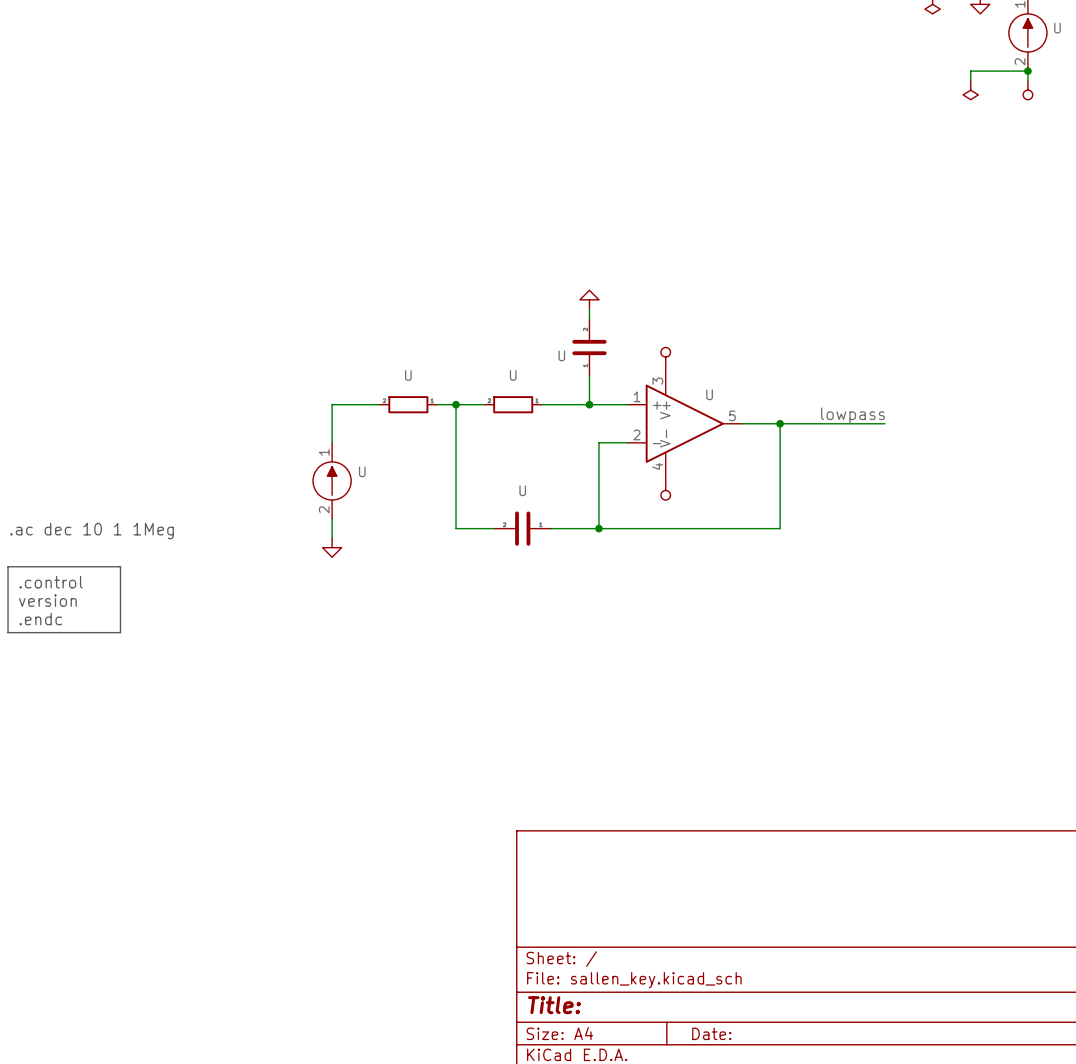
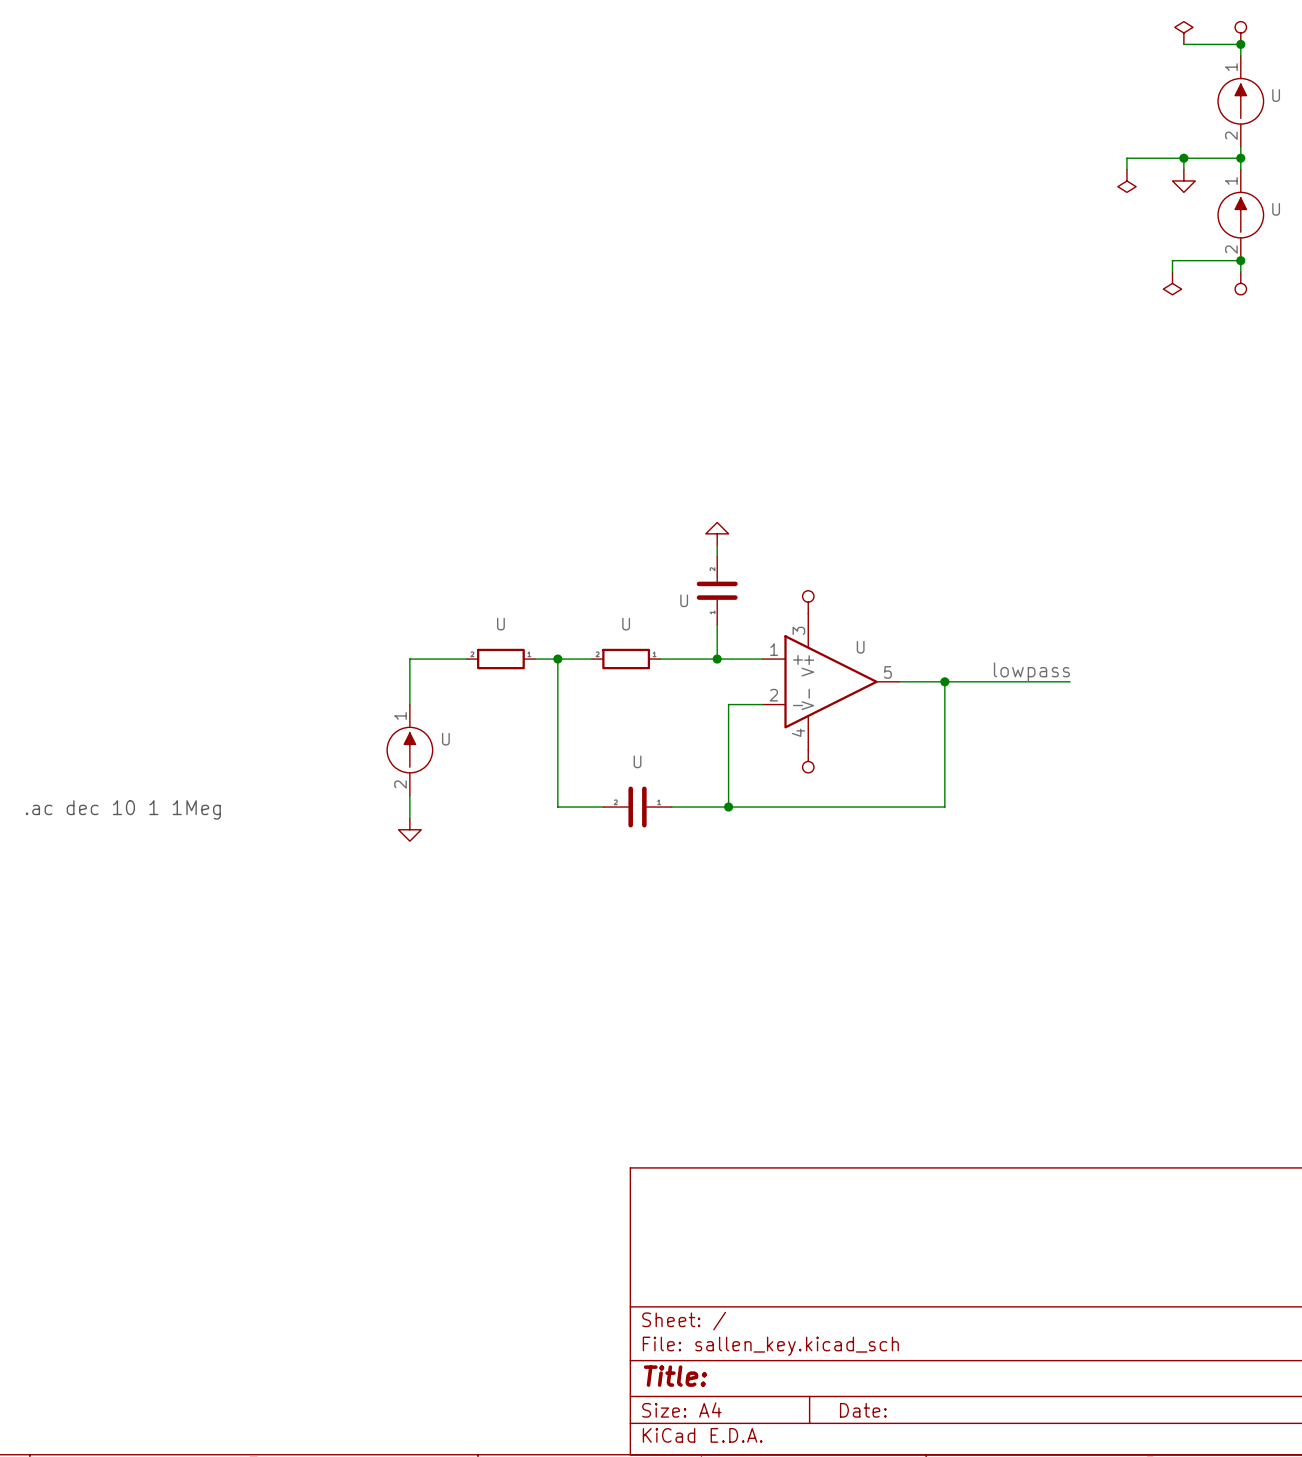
line: (8, 566) (120, 566) (120, 632) (8, 632) (8, 566) -> none
text: .control (51, 582) -> none
text: version (47, 600) -> none
text: .endc (40, 618) -> none

